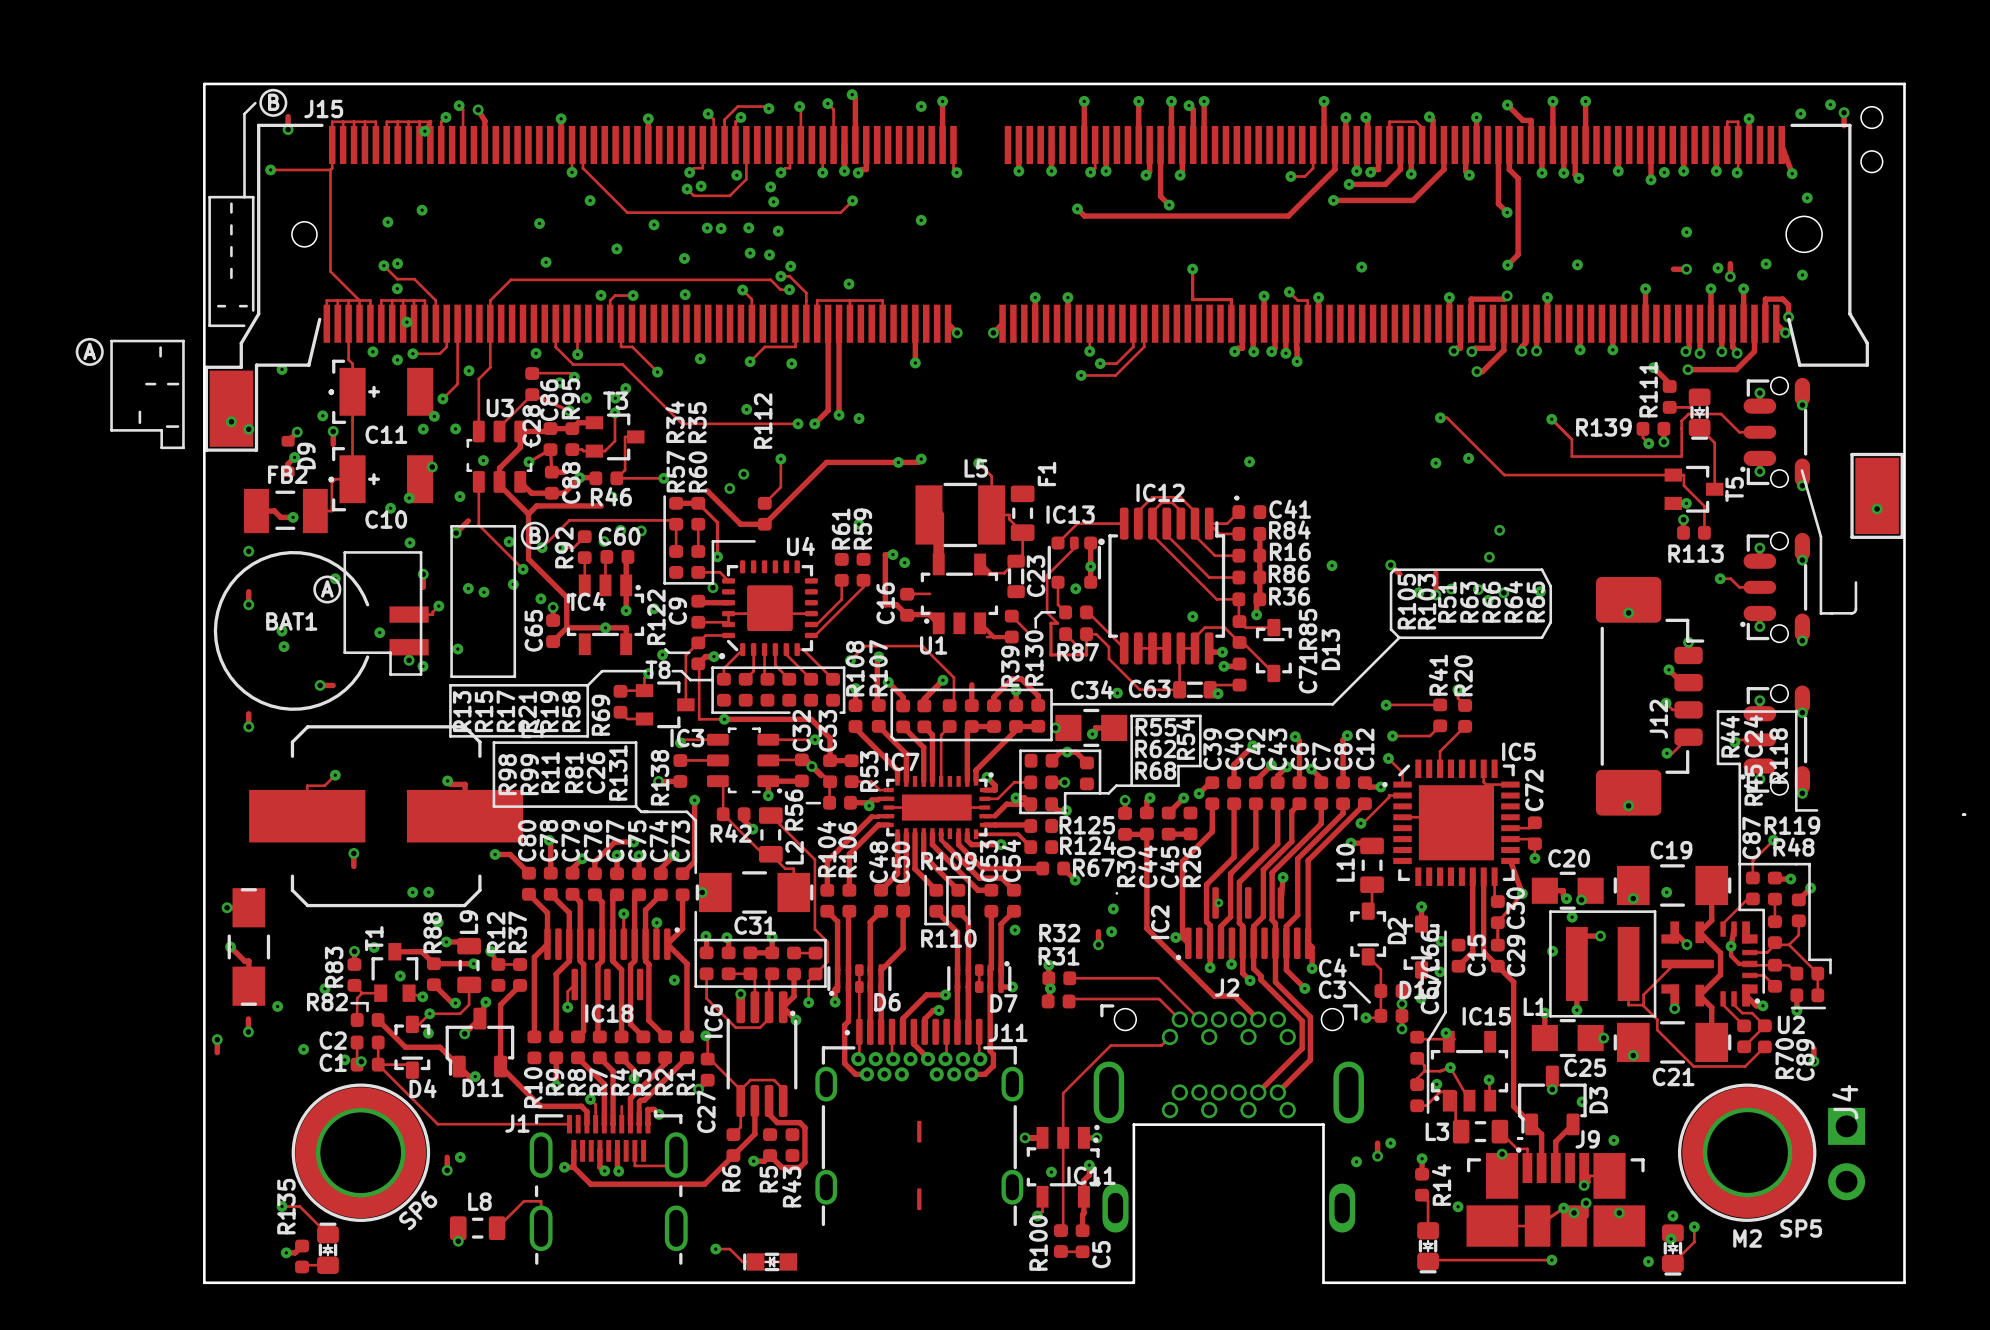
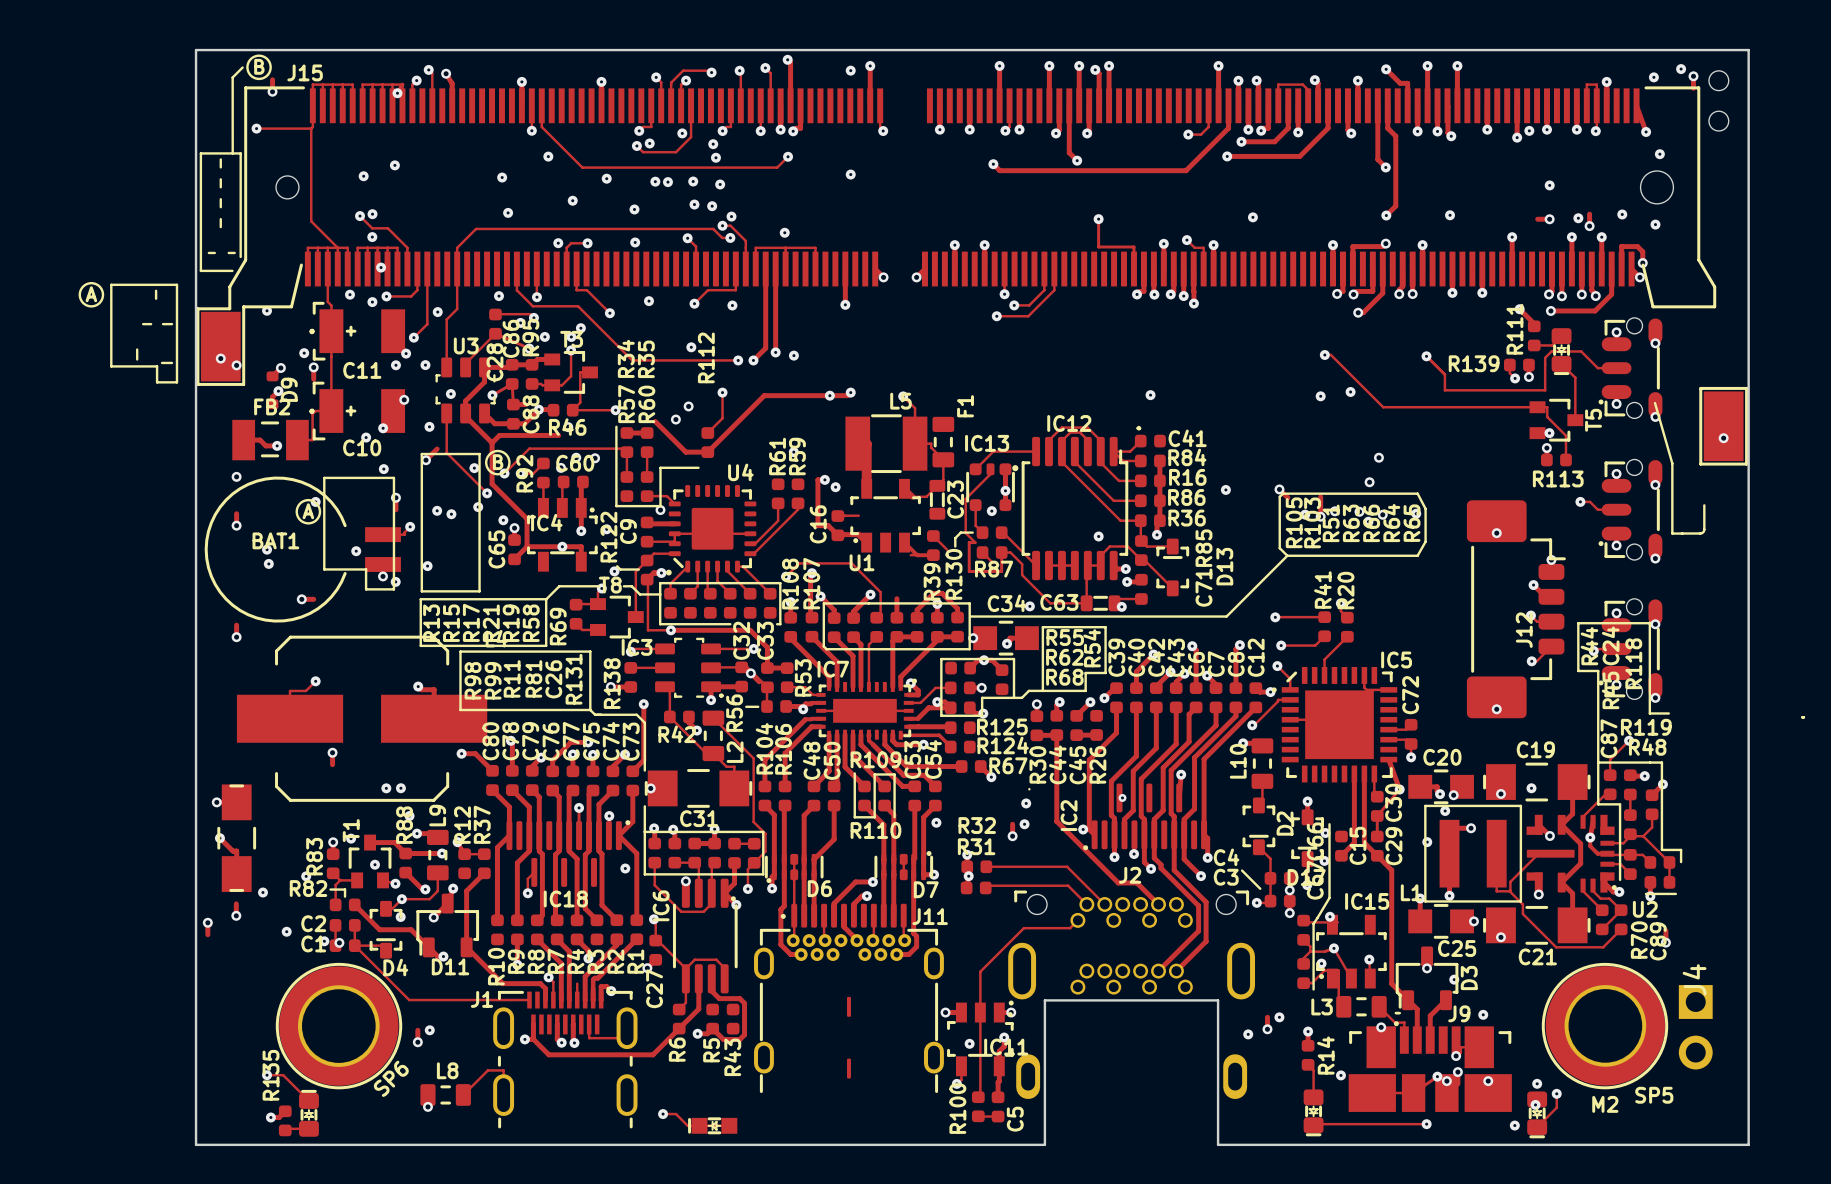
track: (698, 503) (717, 522) (717, 556) -> none
via: (717, 556) -> none

